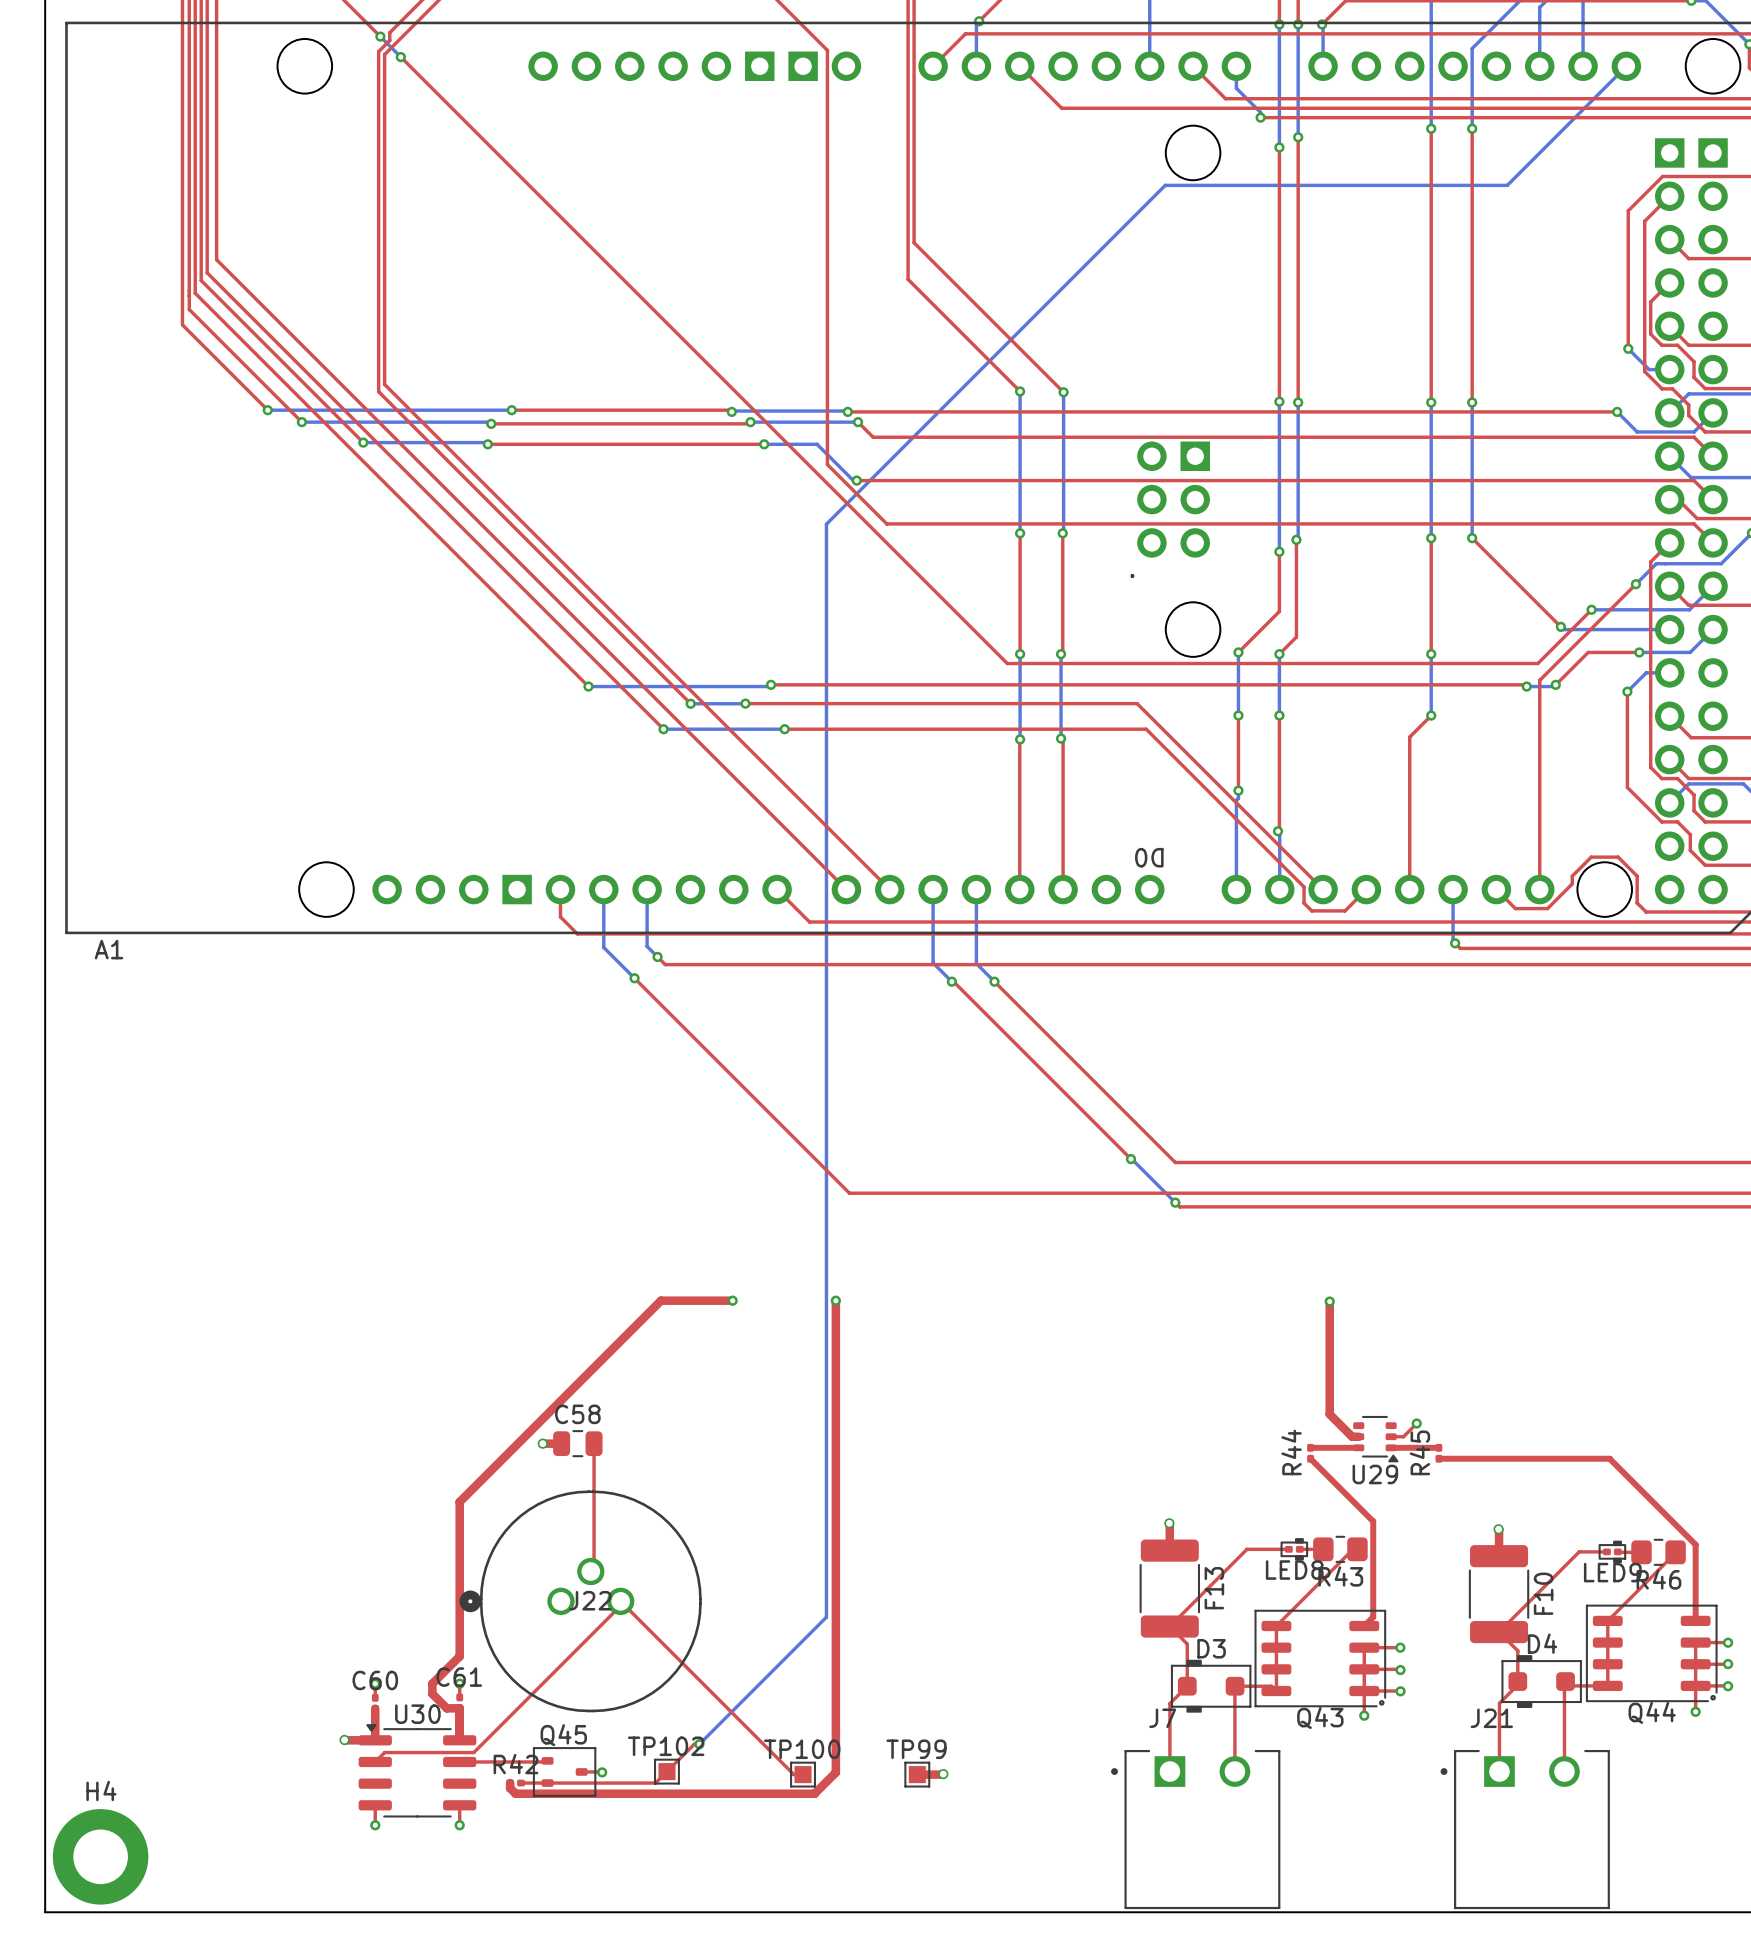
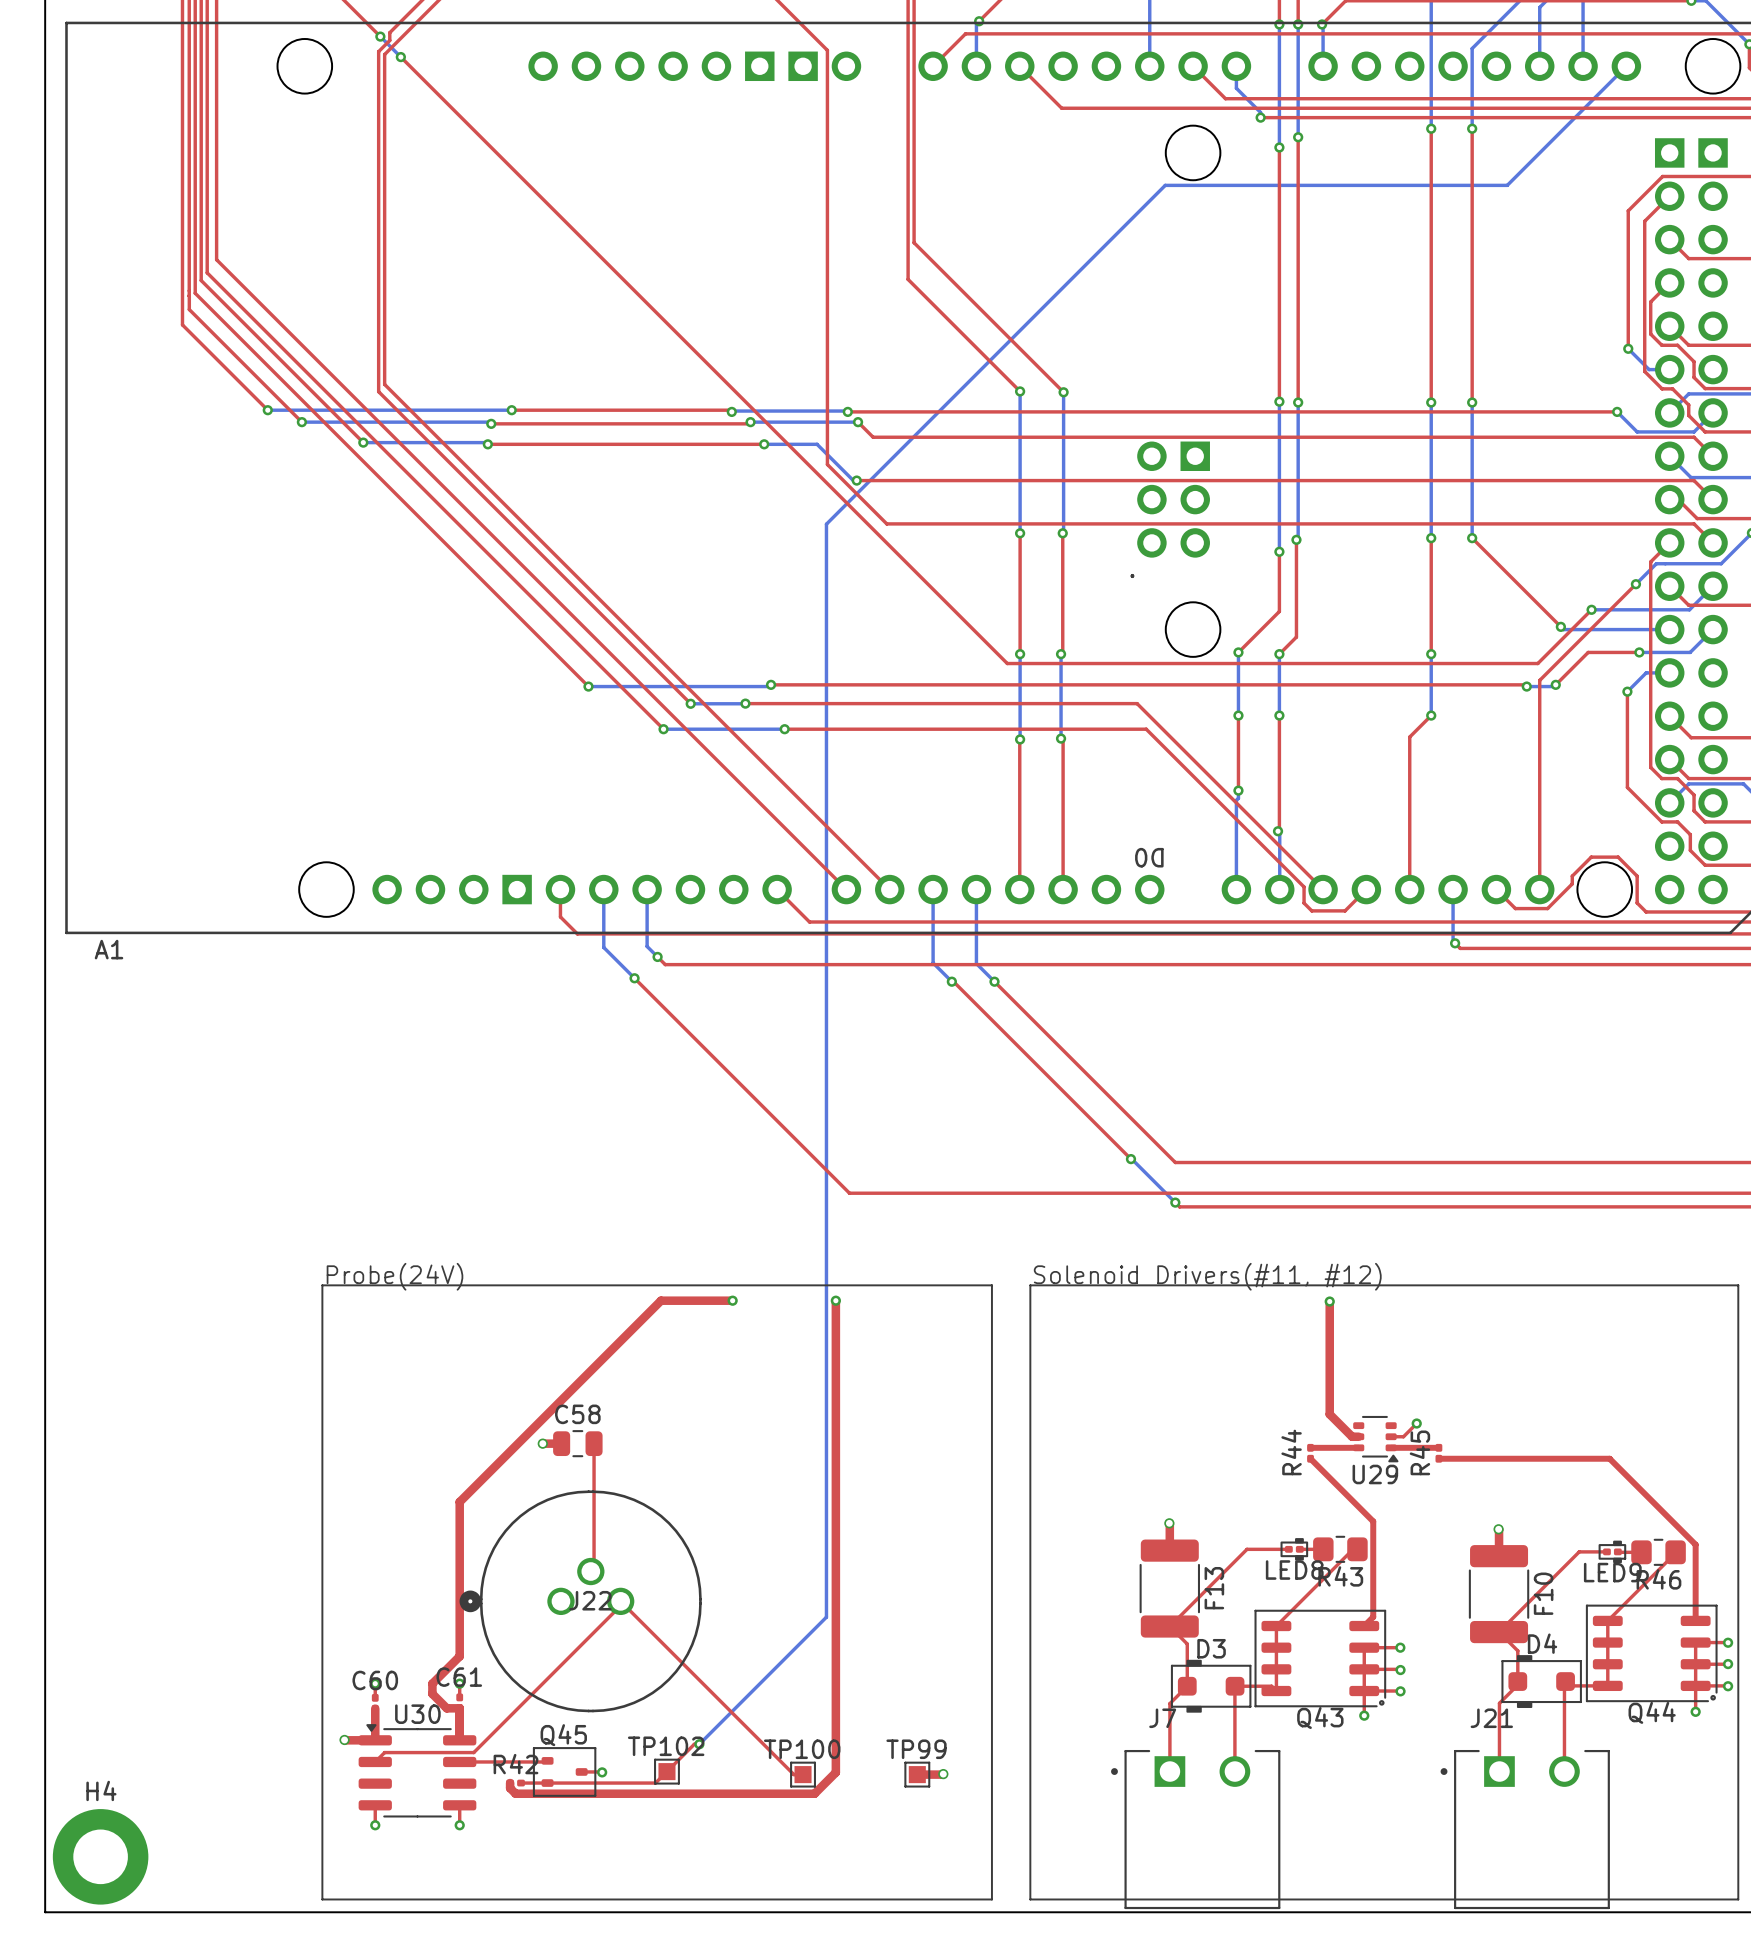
text: none -> Probe(24V) (394, 1276)
text: none -> Solenoid Drivers(#11, #12) (1207, 1276)
line: none -> (322, 1285) (991, 1285) (991, 1899) (322, 1899) (322, 1285)
line: none -> (1030, 1285) (1738, 1285) (1738, 1899) (1030, 1899) (1030, 1285)

